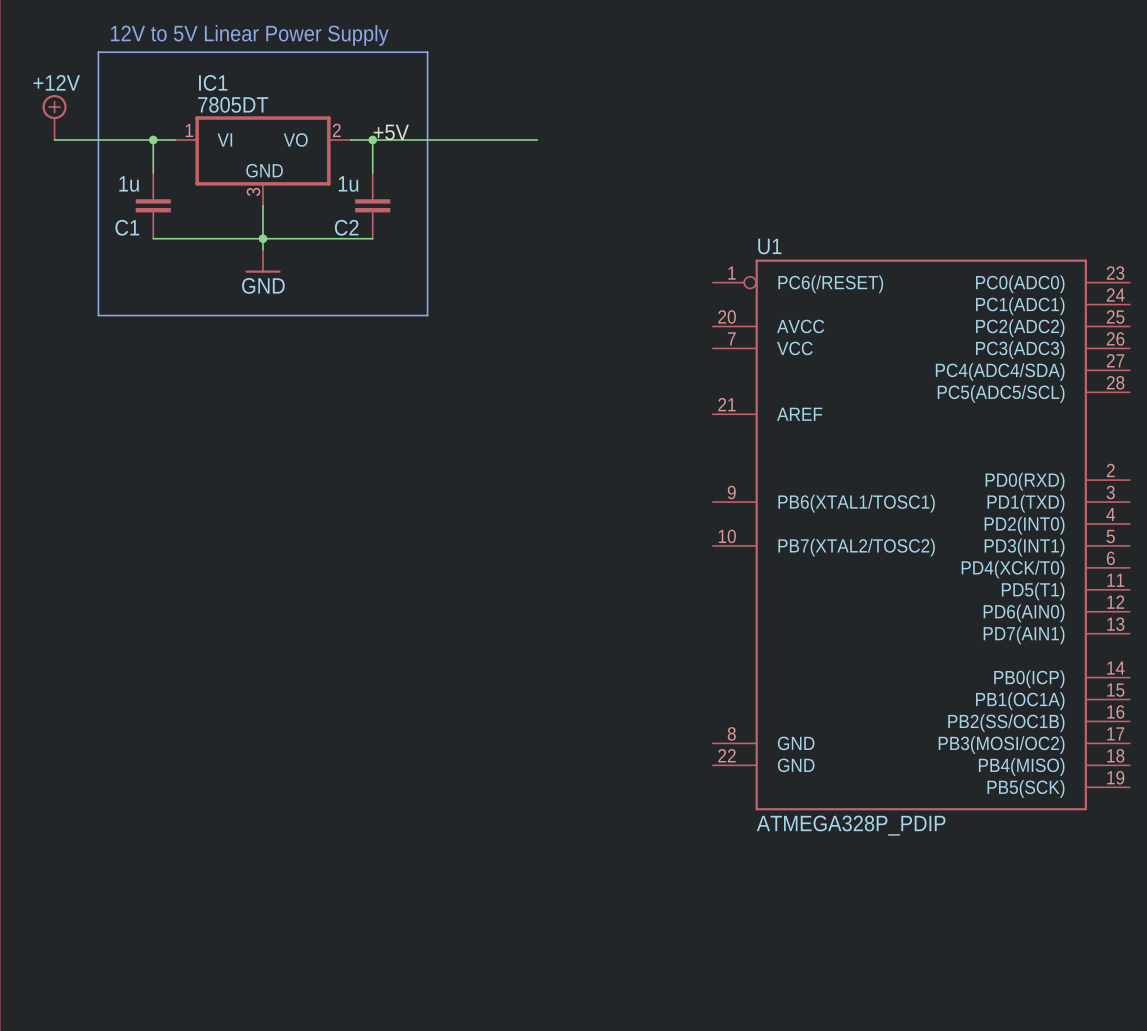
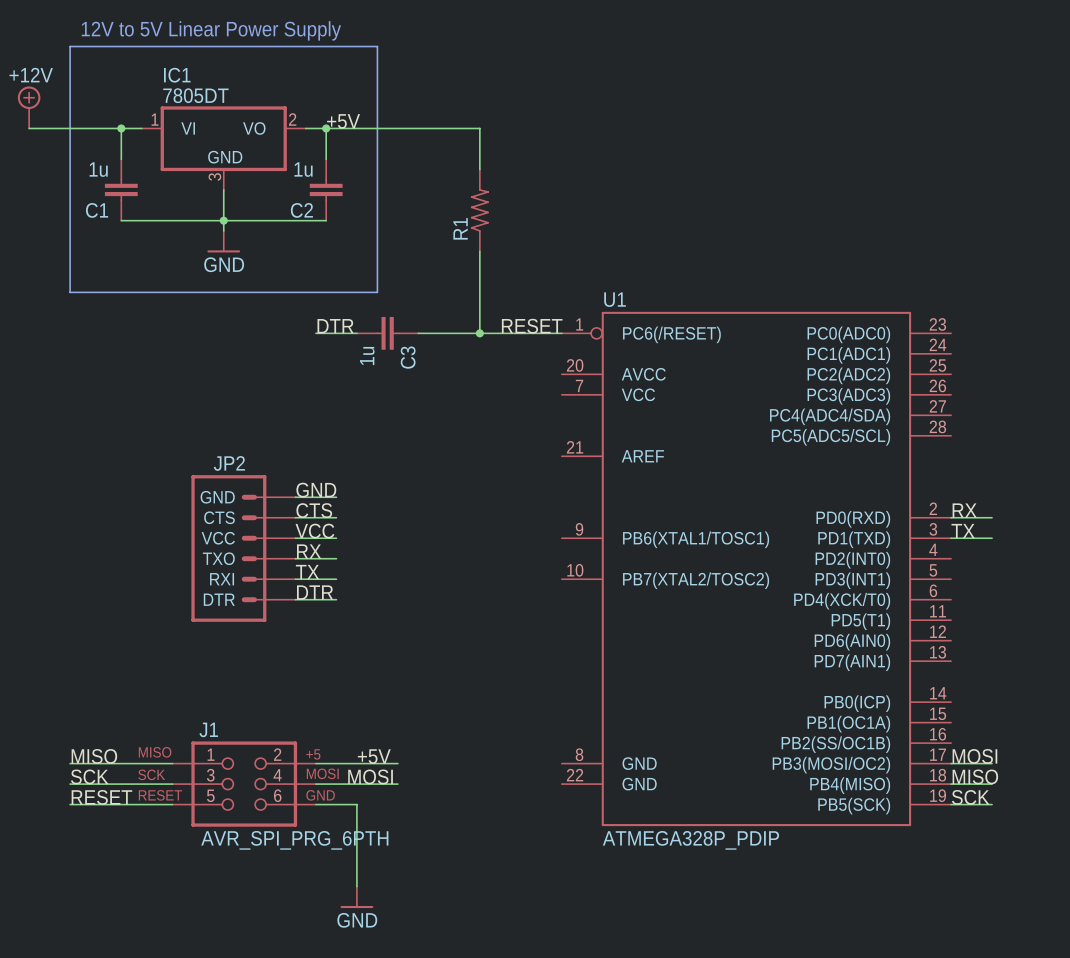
wire: none -> (479, 128) (479, 169)
R1: none -> (479, 210)
wire: none -> (479, 251) (479, 333)
label: none -> DTR (335, 326)
label: none -> RESET (532, 326)
wire: none -> (315, 333) (356, 333)
C3: none -> 1u (387, 333)
wire: none -> (418, 333) (561, 333)
junction: none -> (479, 333)
label: none -> GND (316, 490)
wire: none -> (295, 497) (336, 497)
U1 position: (921, 534) -> (756, 568)
label: none -> CTS (314, 510)
label: none -> RX (964, 510)
wire: none -> (295, 517) (336, 517)
wire: none -> (951, 517) (992, 517)
label: none -> VCC (314, 531)
label: none -> TX (963, 531)
wire: none -> (295, 538) (336, 538)
wire: none -> (951, 538) (992, 538)
JP2: none -> (243, 548)
label: none -> RX (309, 551)
wire: none -> (295, 558) (336, 558)
label: none -> TX (307, 572)
wire: none -> (295, 579) (336, 579)
label: none -> DTR (315, 592)
wire: none -> (295, 599) (336, 599)
label: none -> MISO (94, 756)
label: none -> +5V (374, 756)
label: none -> MOSI (974, 756)
wire: none -> (70, 763) (172, 763)
wire: none -> (315, 763) (397, 763)
wire: none -> (951, 763) (992, 763)
label: none -> SCK (89, 776)
label: none -> MOSI (370, 776)
label: none -> MISO (975, 776)
wire: none -> (70, 784) (172, 784)
J1: none -> AVR_SPI_PRG_6PTH (244, 784)
wire: none -> (315, 784) (397, 784)
wire: none -> (951, 784) (992, 784)
label: none -> RESET (101, 797)
label: none -> SCK (970, 797)
wire: none -> (70, 804) (172, 804)
wire: none -> (315, 804) (356, 804) (356, 886)
wire: none -> (951, 804) (992, 804)
power symbol: none -> GND (356, 897)

